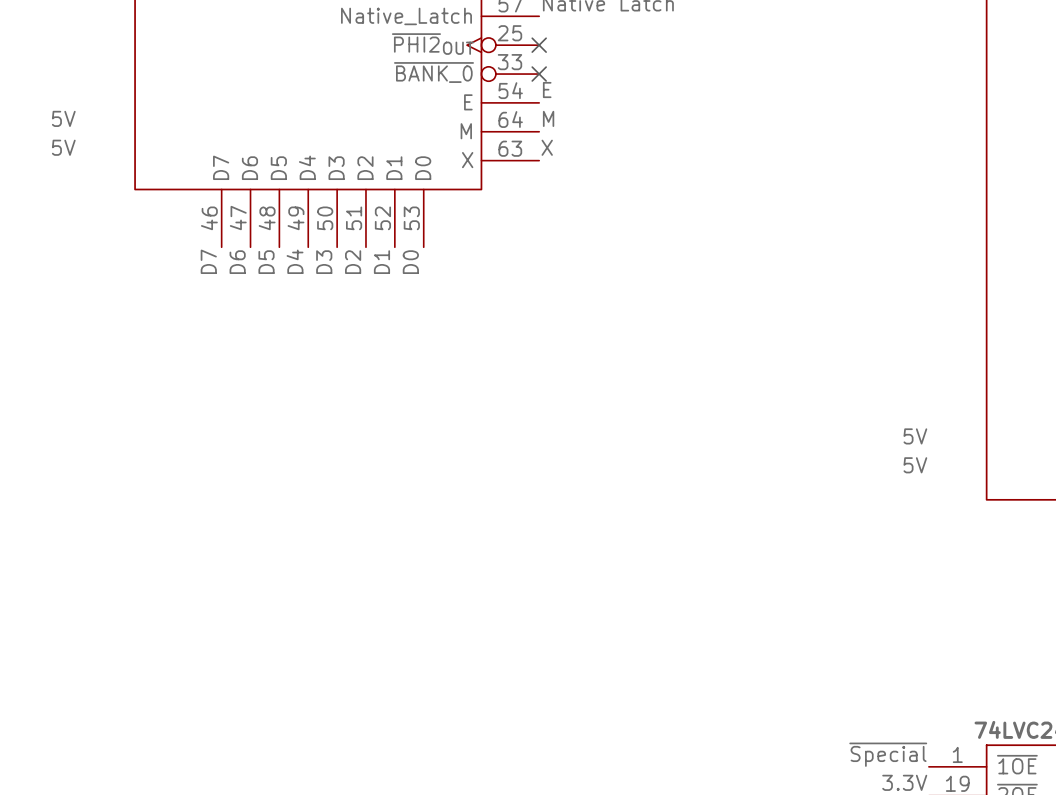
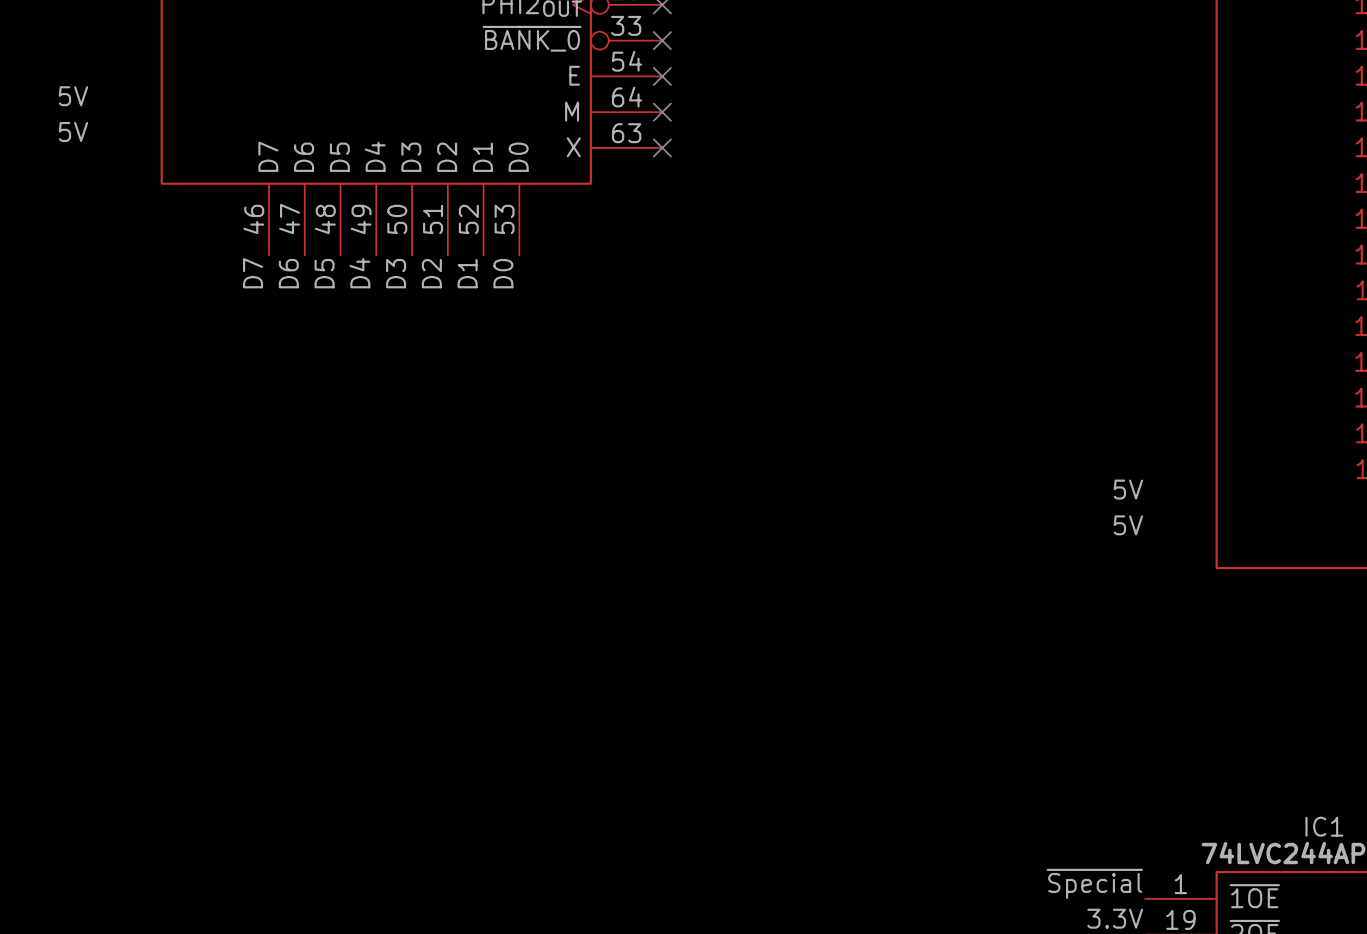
label: E (547, 90) -> none
no-connect mark: none -> (662, 76)
label: M (548, 118) -> none
no-connect mark: none -> (662, 112)
label: X (547, 147) -> none
no-connect mark: none -> (662, 147)

